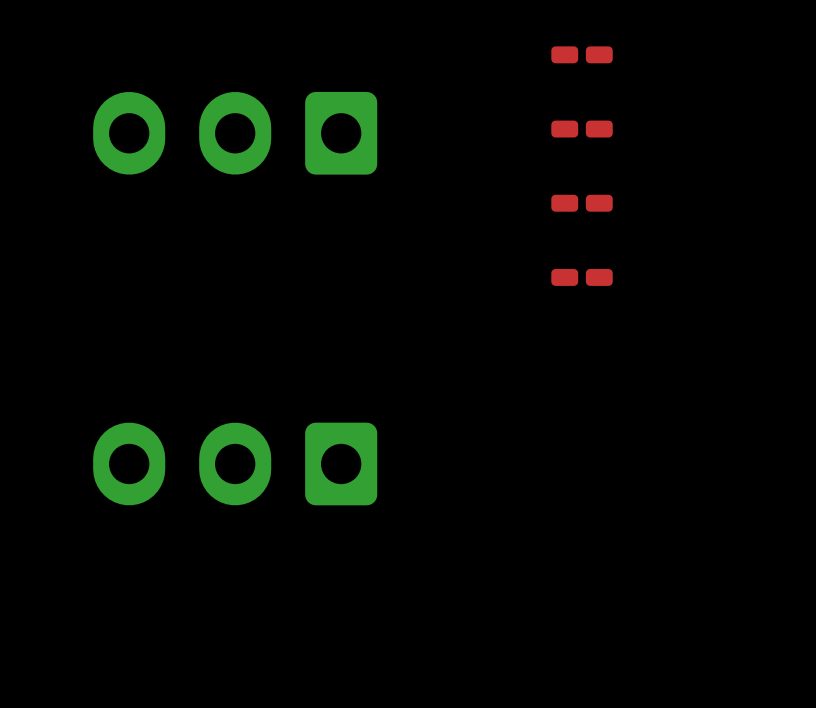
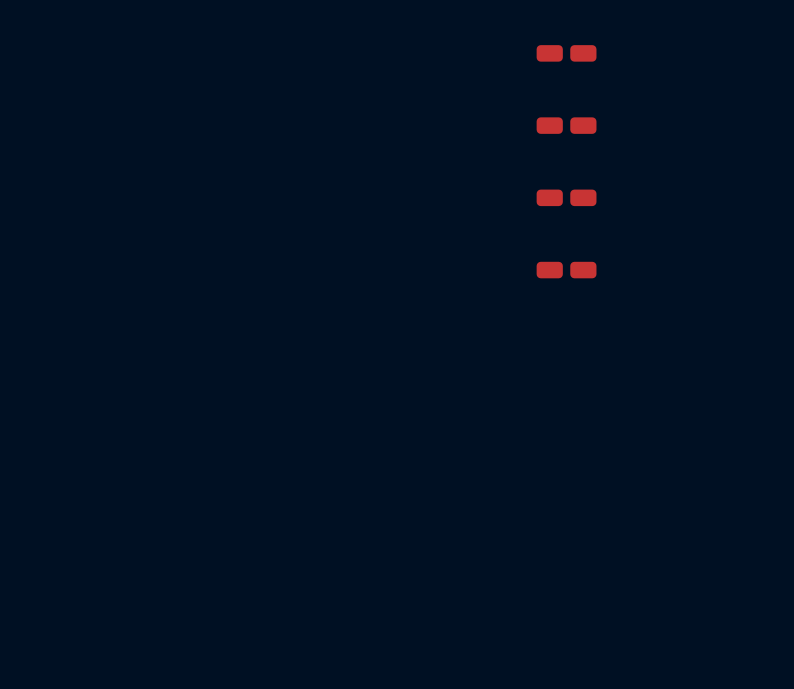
part: (235, 133) -> none
part: (235, 463) -> none

